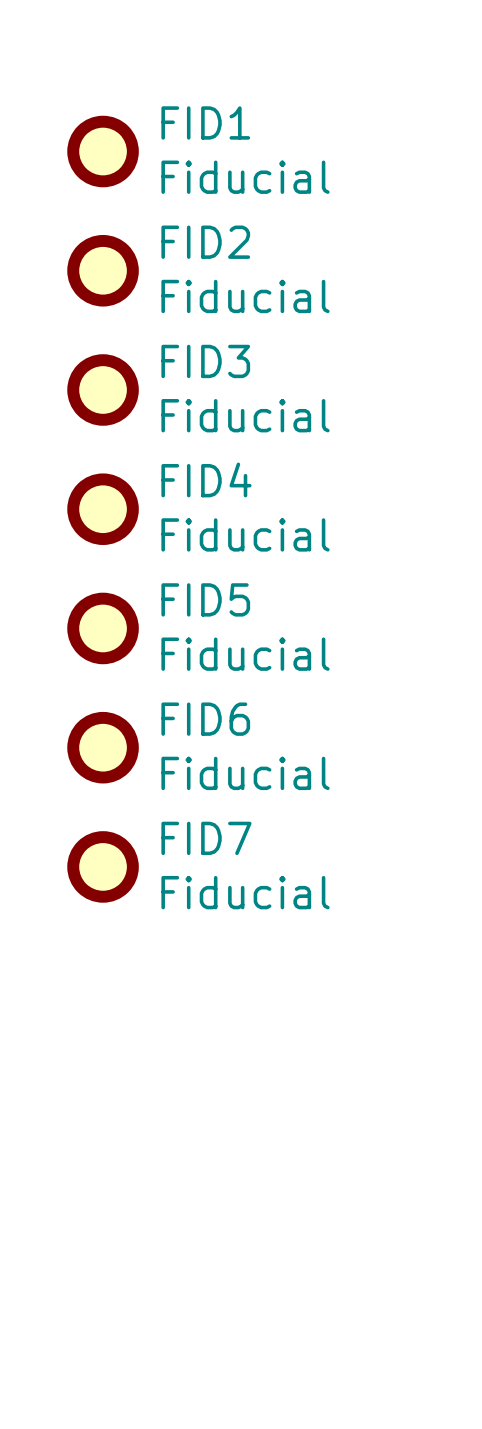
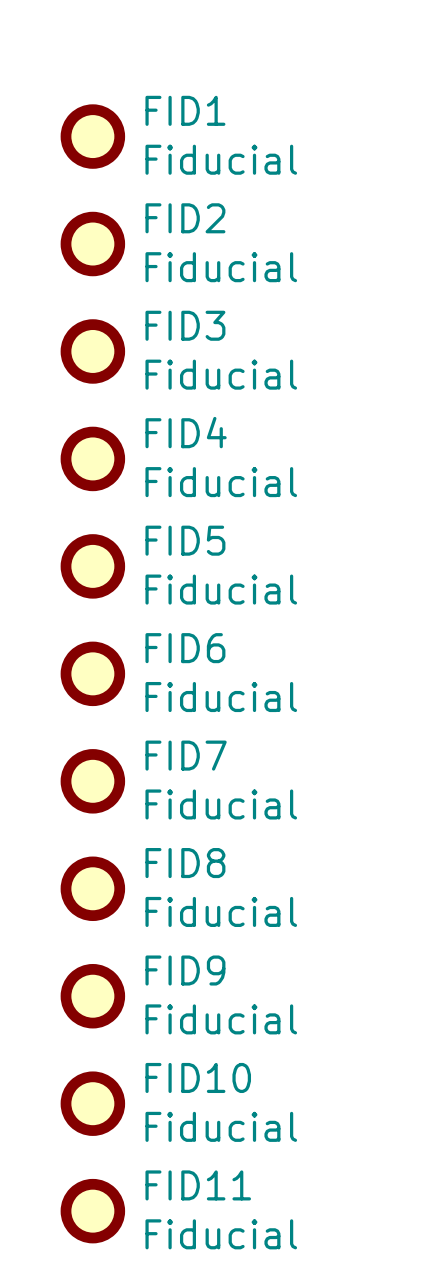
FID8: none -> Fiducial (92, 888)
FID9: none -> Fiducial (92, 996)
FID10: none -> Fiducial (92, 1103)
FID11: none -> Fiducial (92, 1211)

